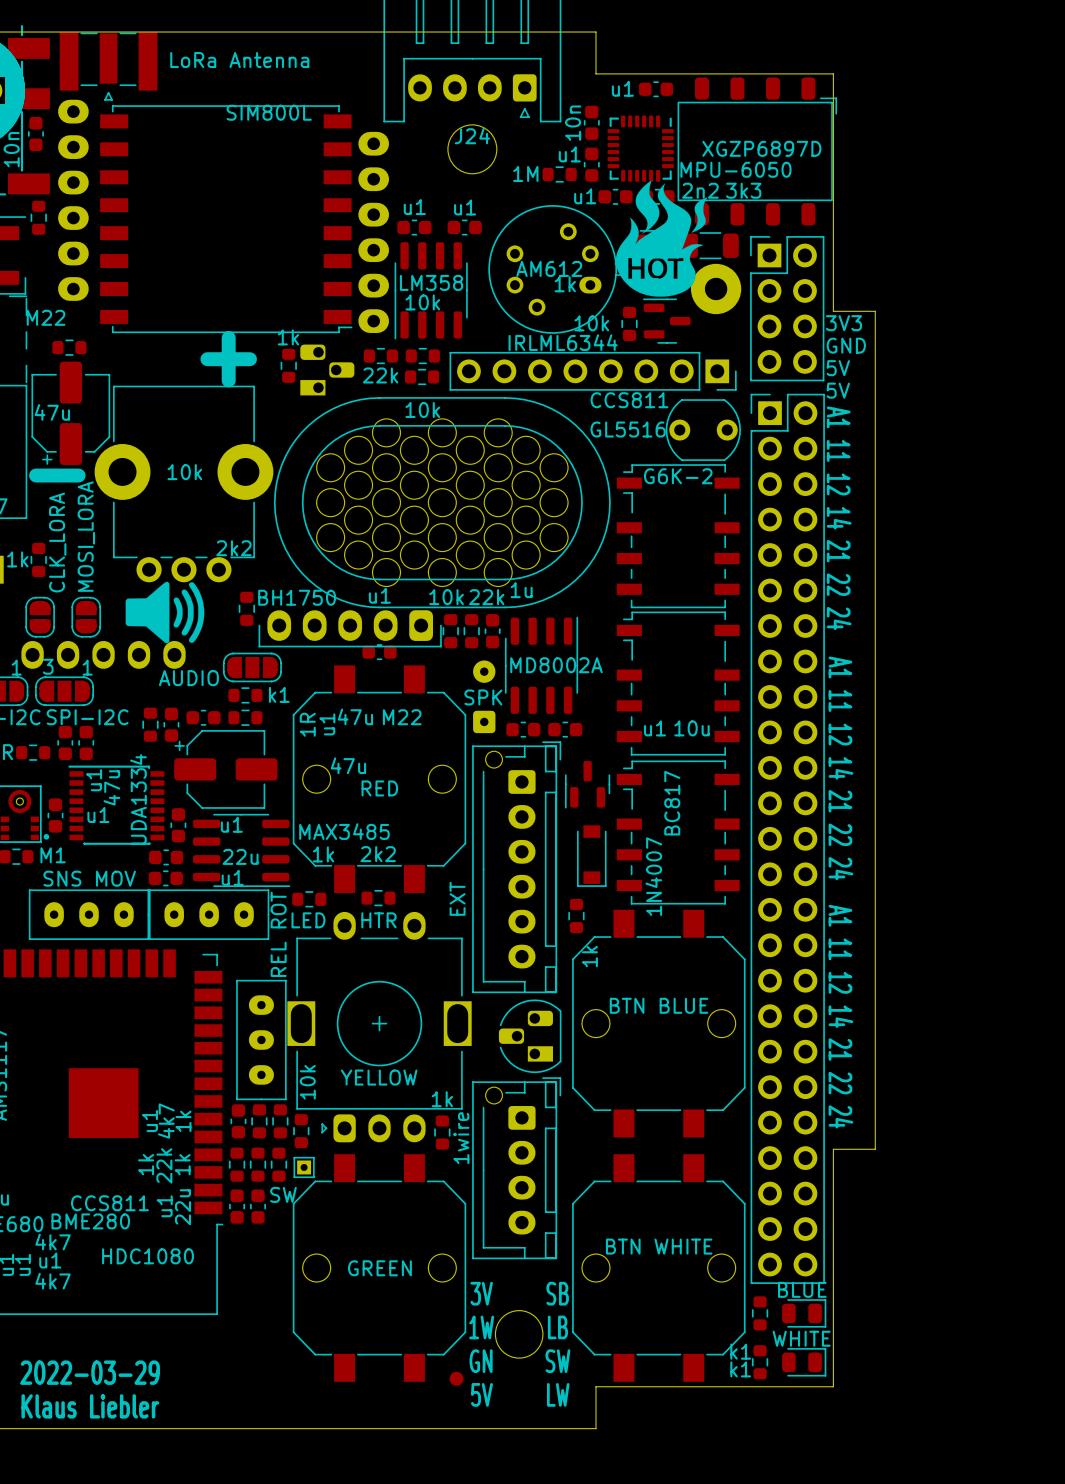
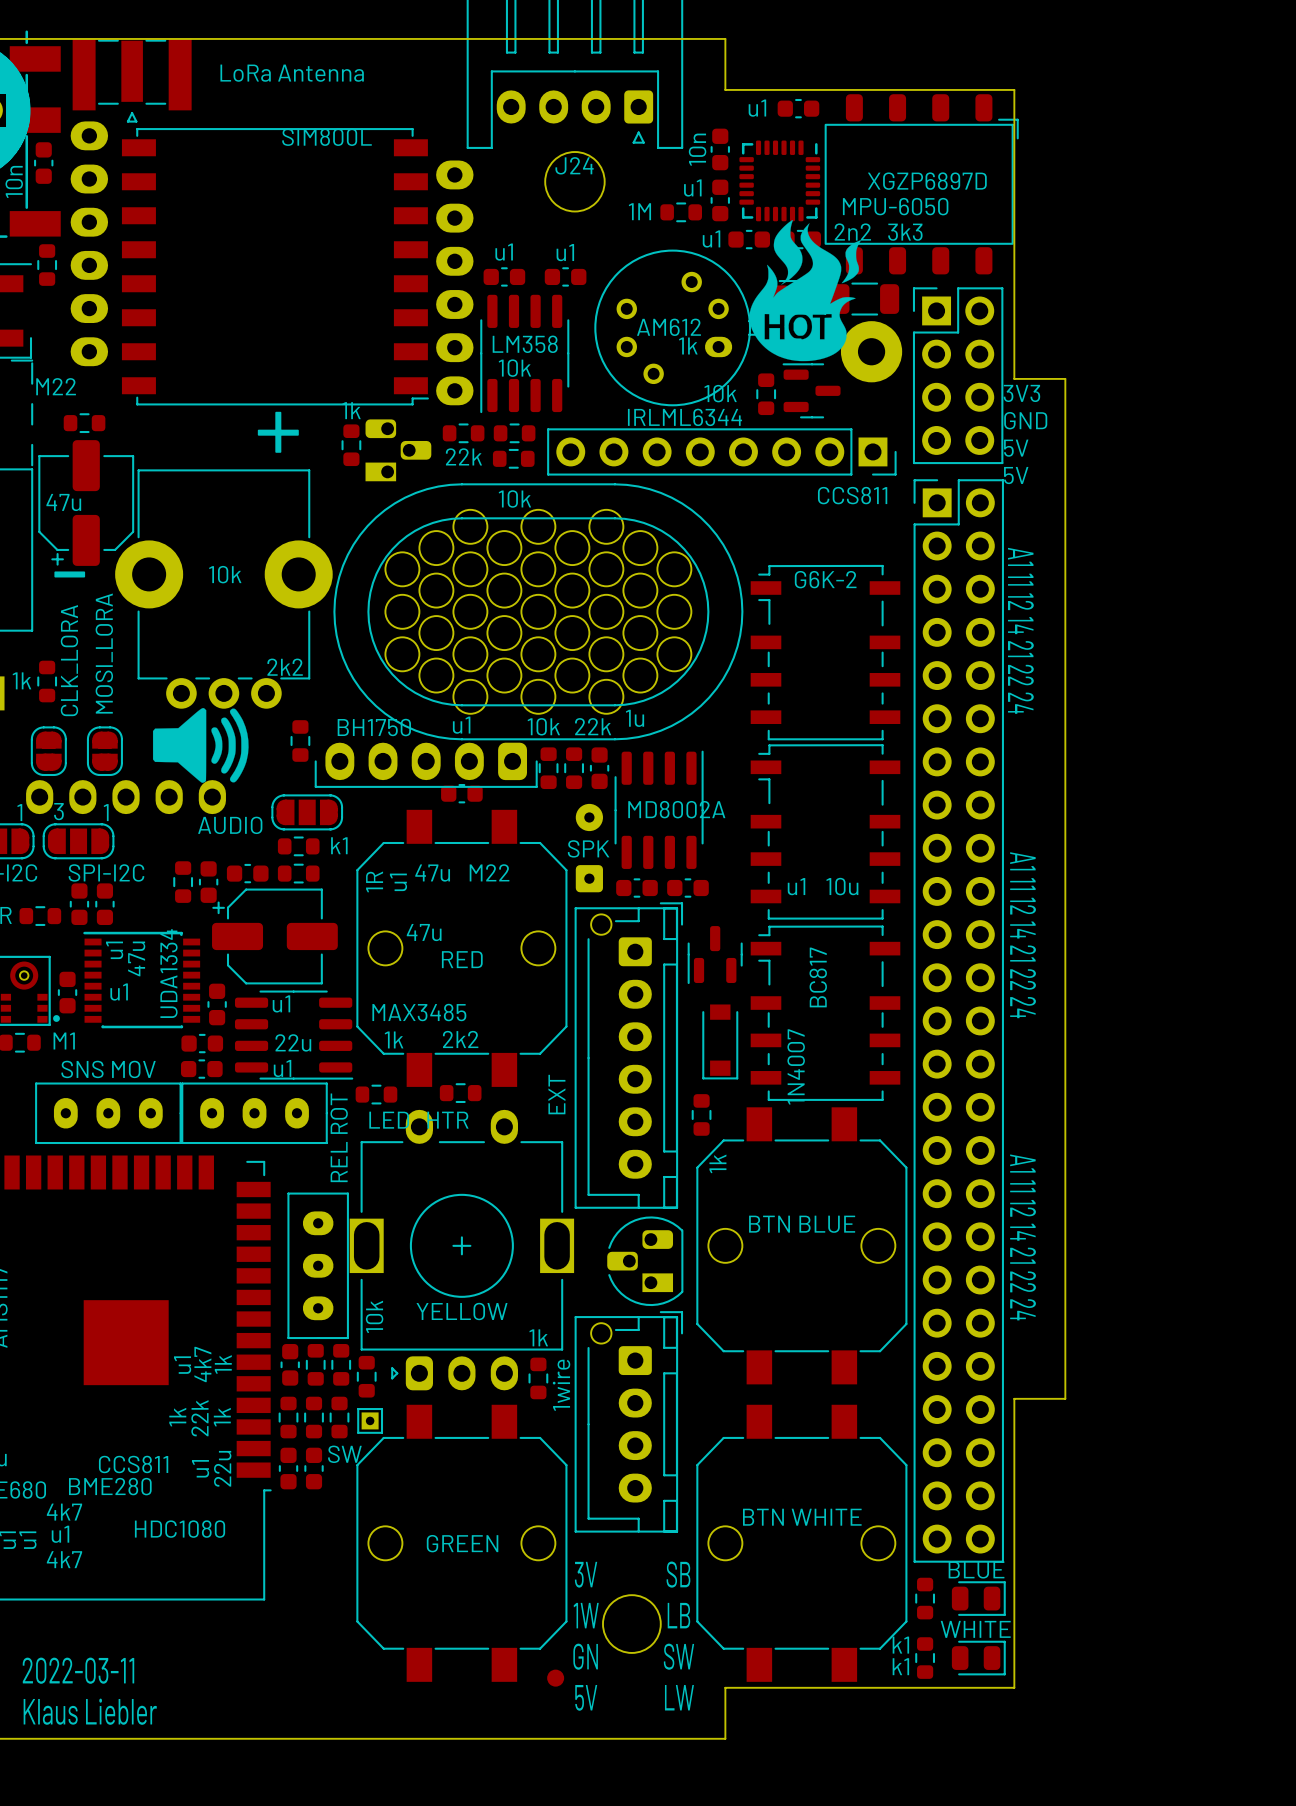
part value position: CCS811 (629, 400) -> CCS811 (852, 495)
part: GL5516 (703, 429) -> none
text: 2022-03-29 (90, 1372) -> 2022-03-11 (78, 1670)

